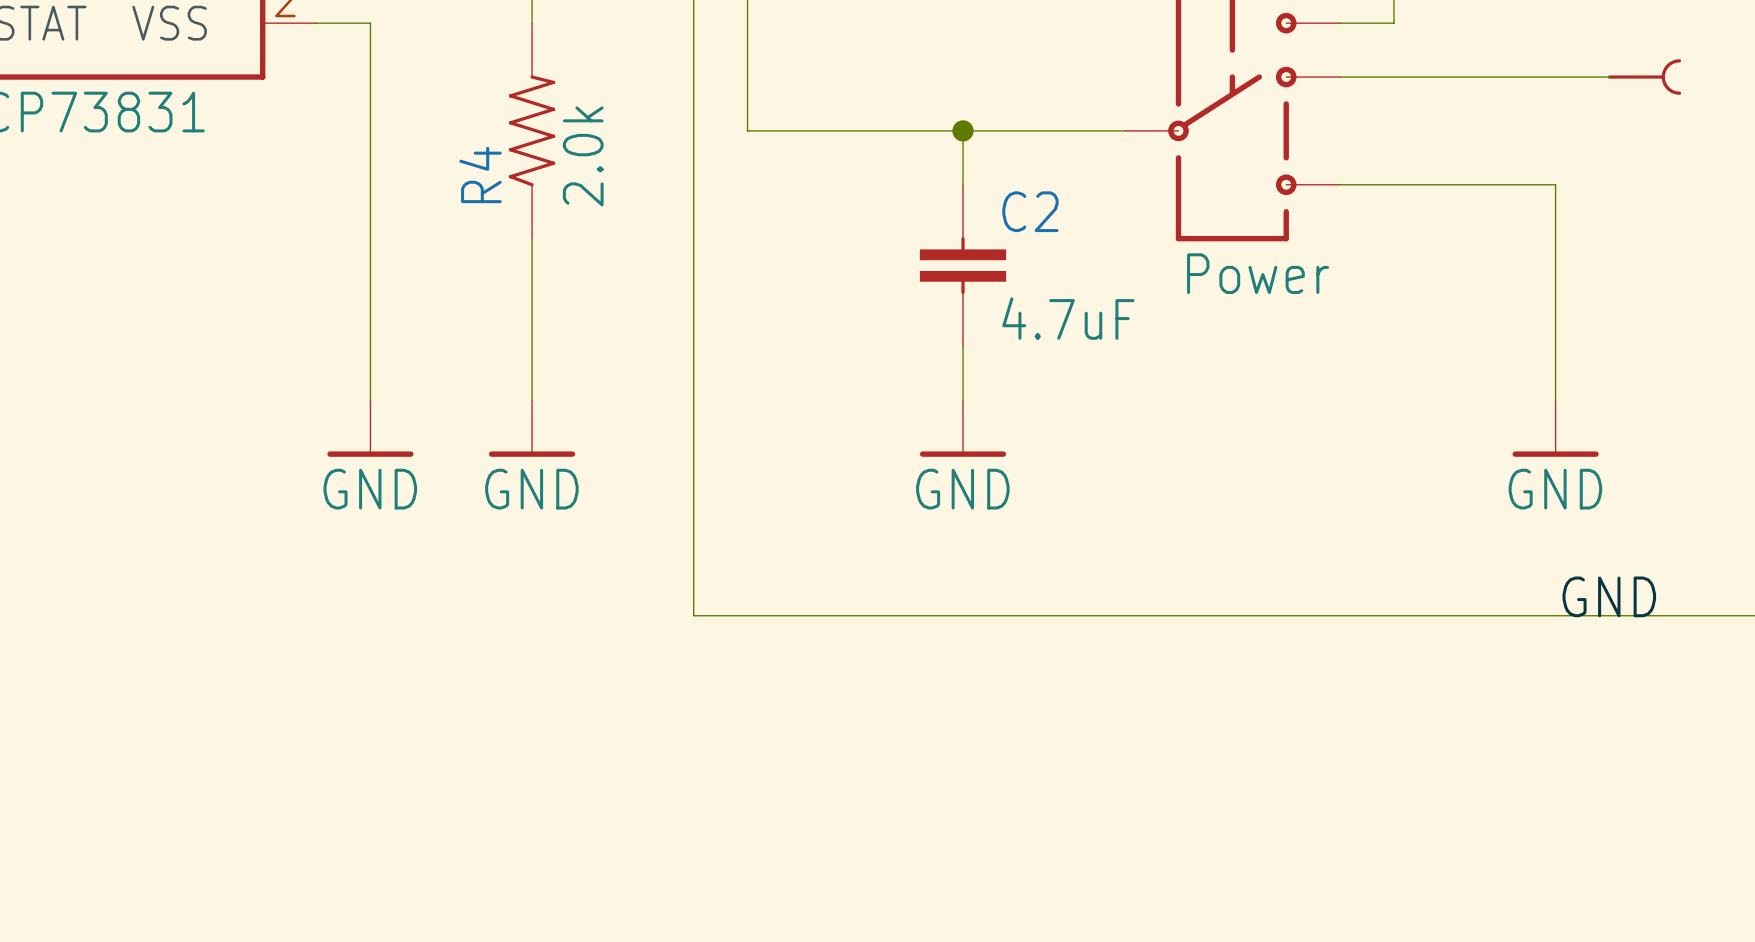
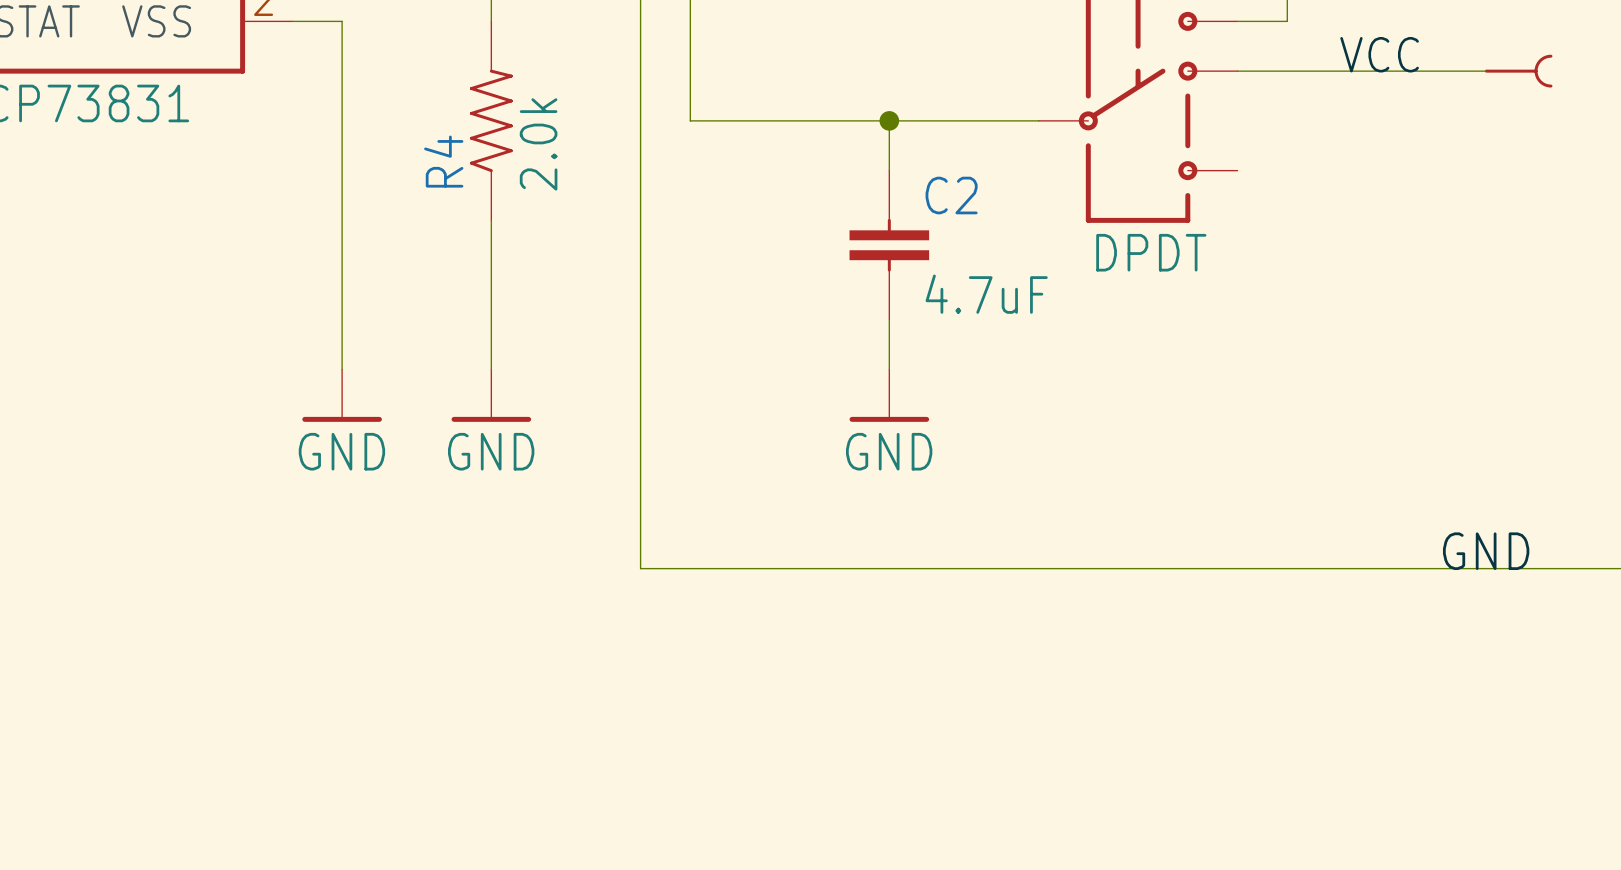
label: none -> VCC (1379, 54)
wire: (1340, 184) (1555, 184) (1555, 400) -> none
part value: Power (1258, 273) -> DPDT (1151, 252)
power symbol: GND (1555, 428) -> none

